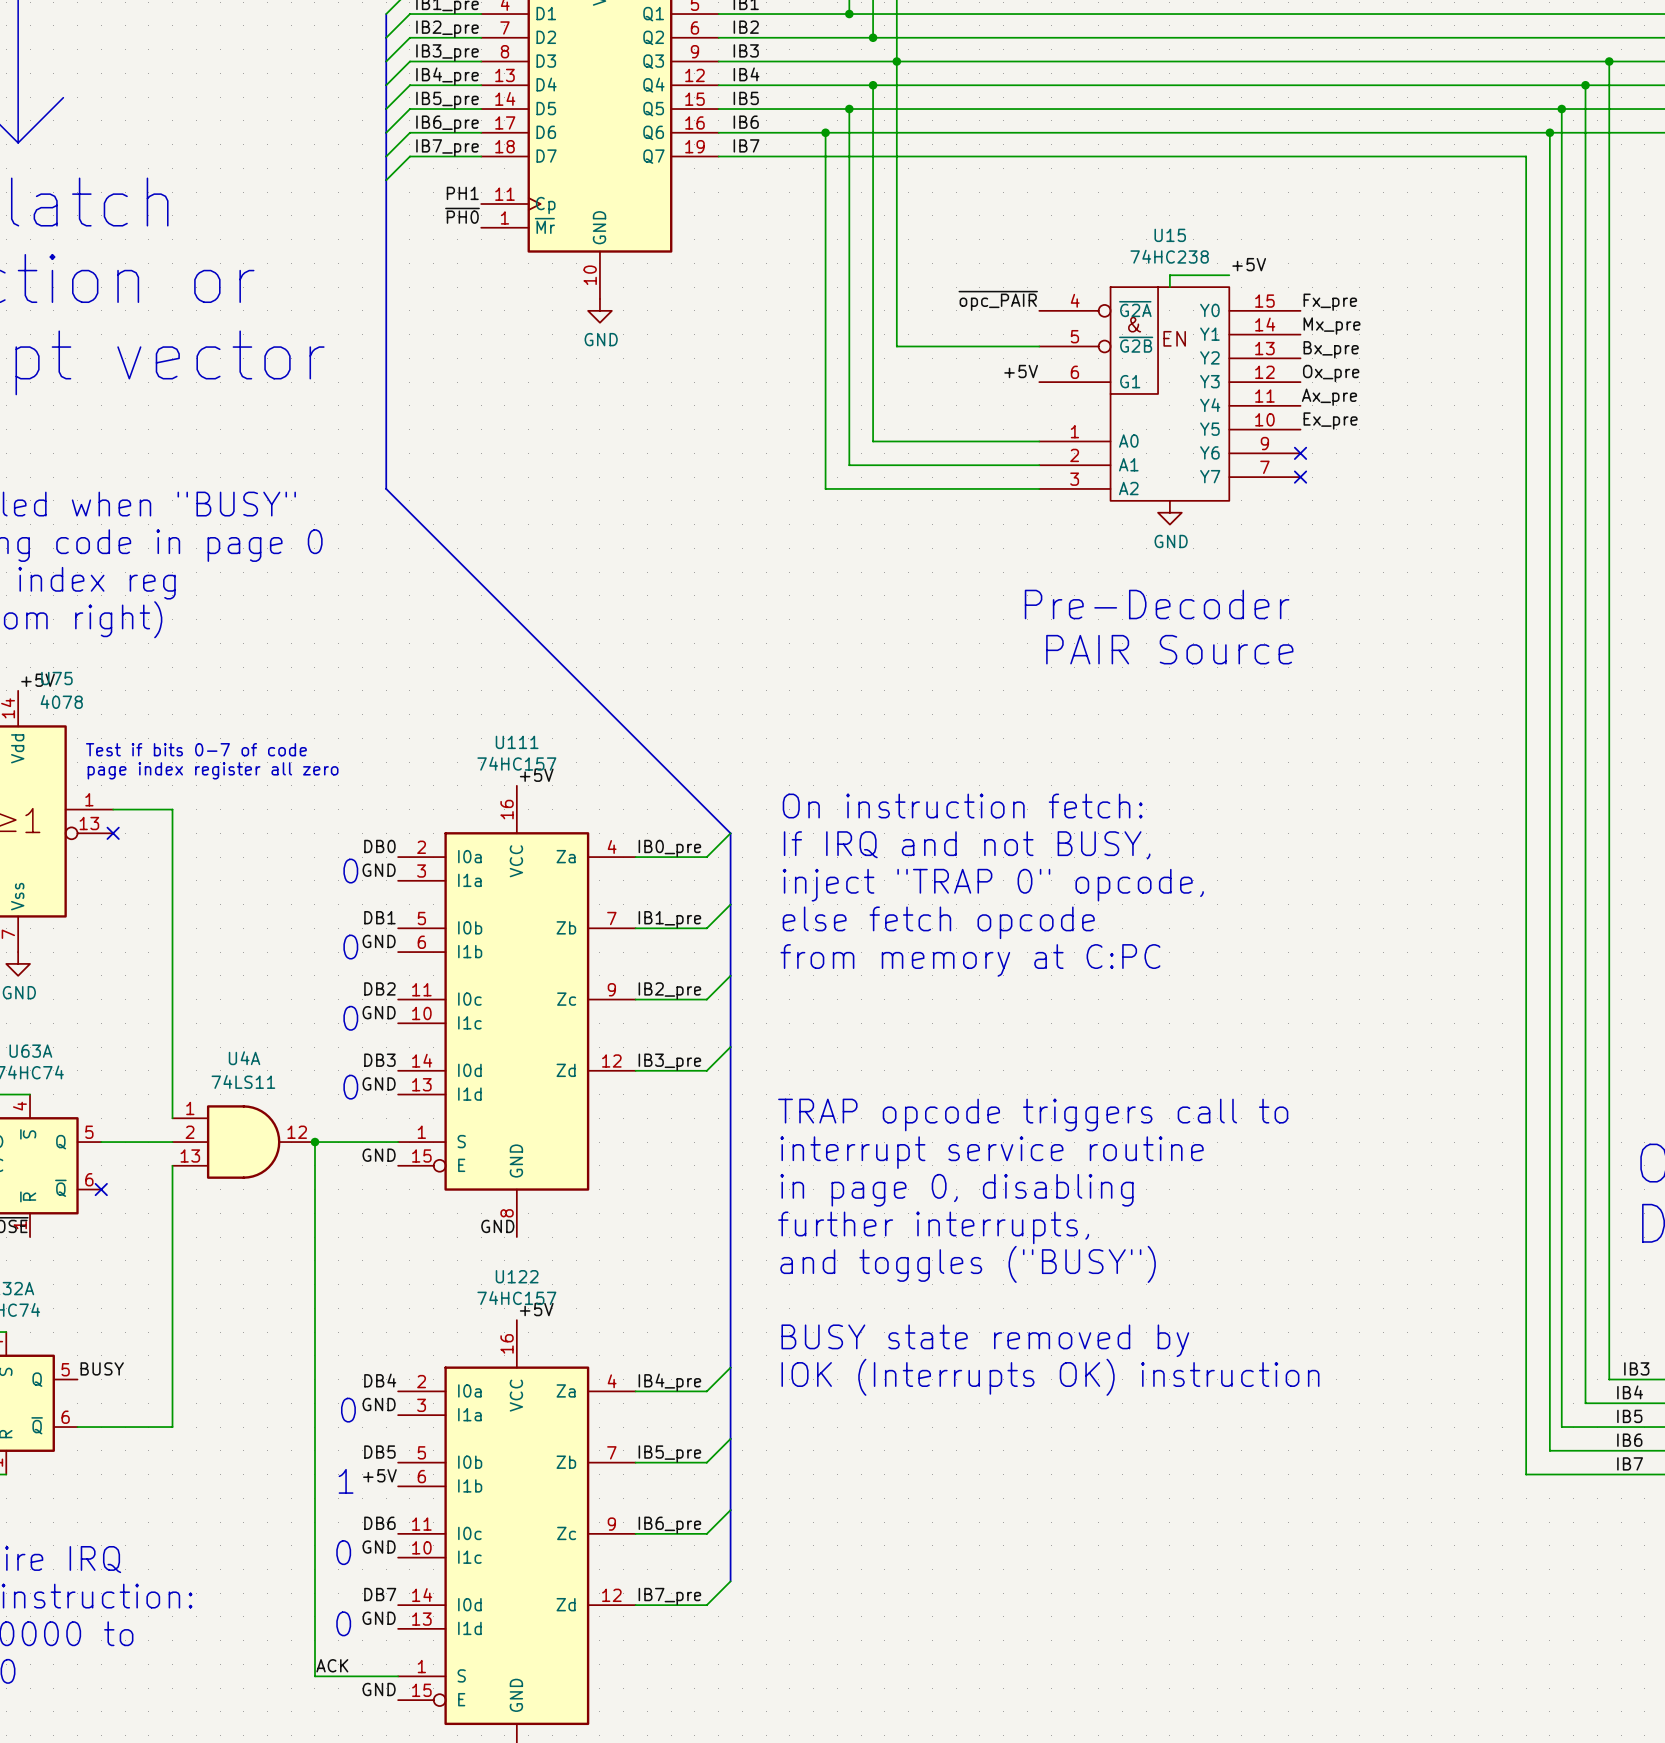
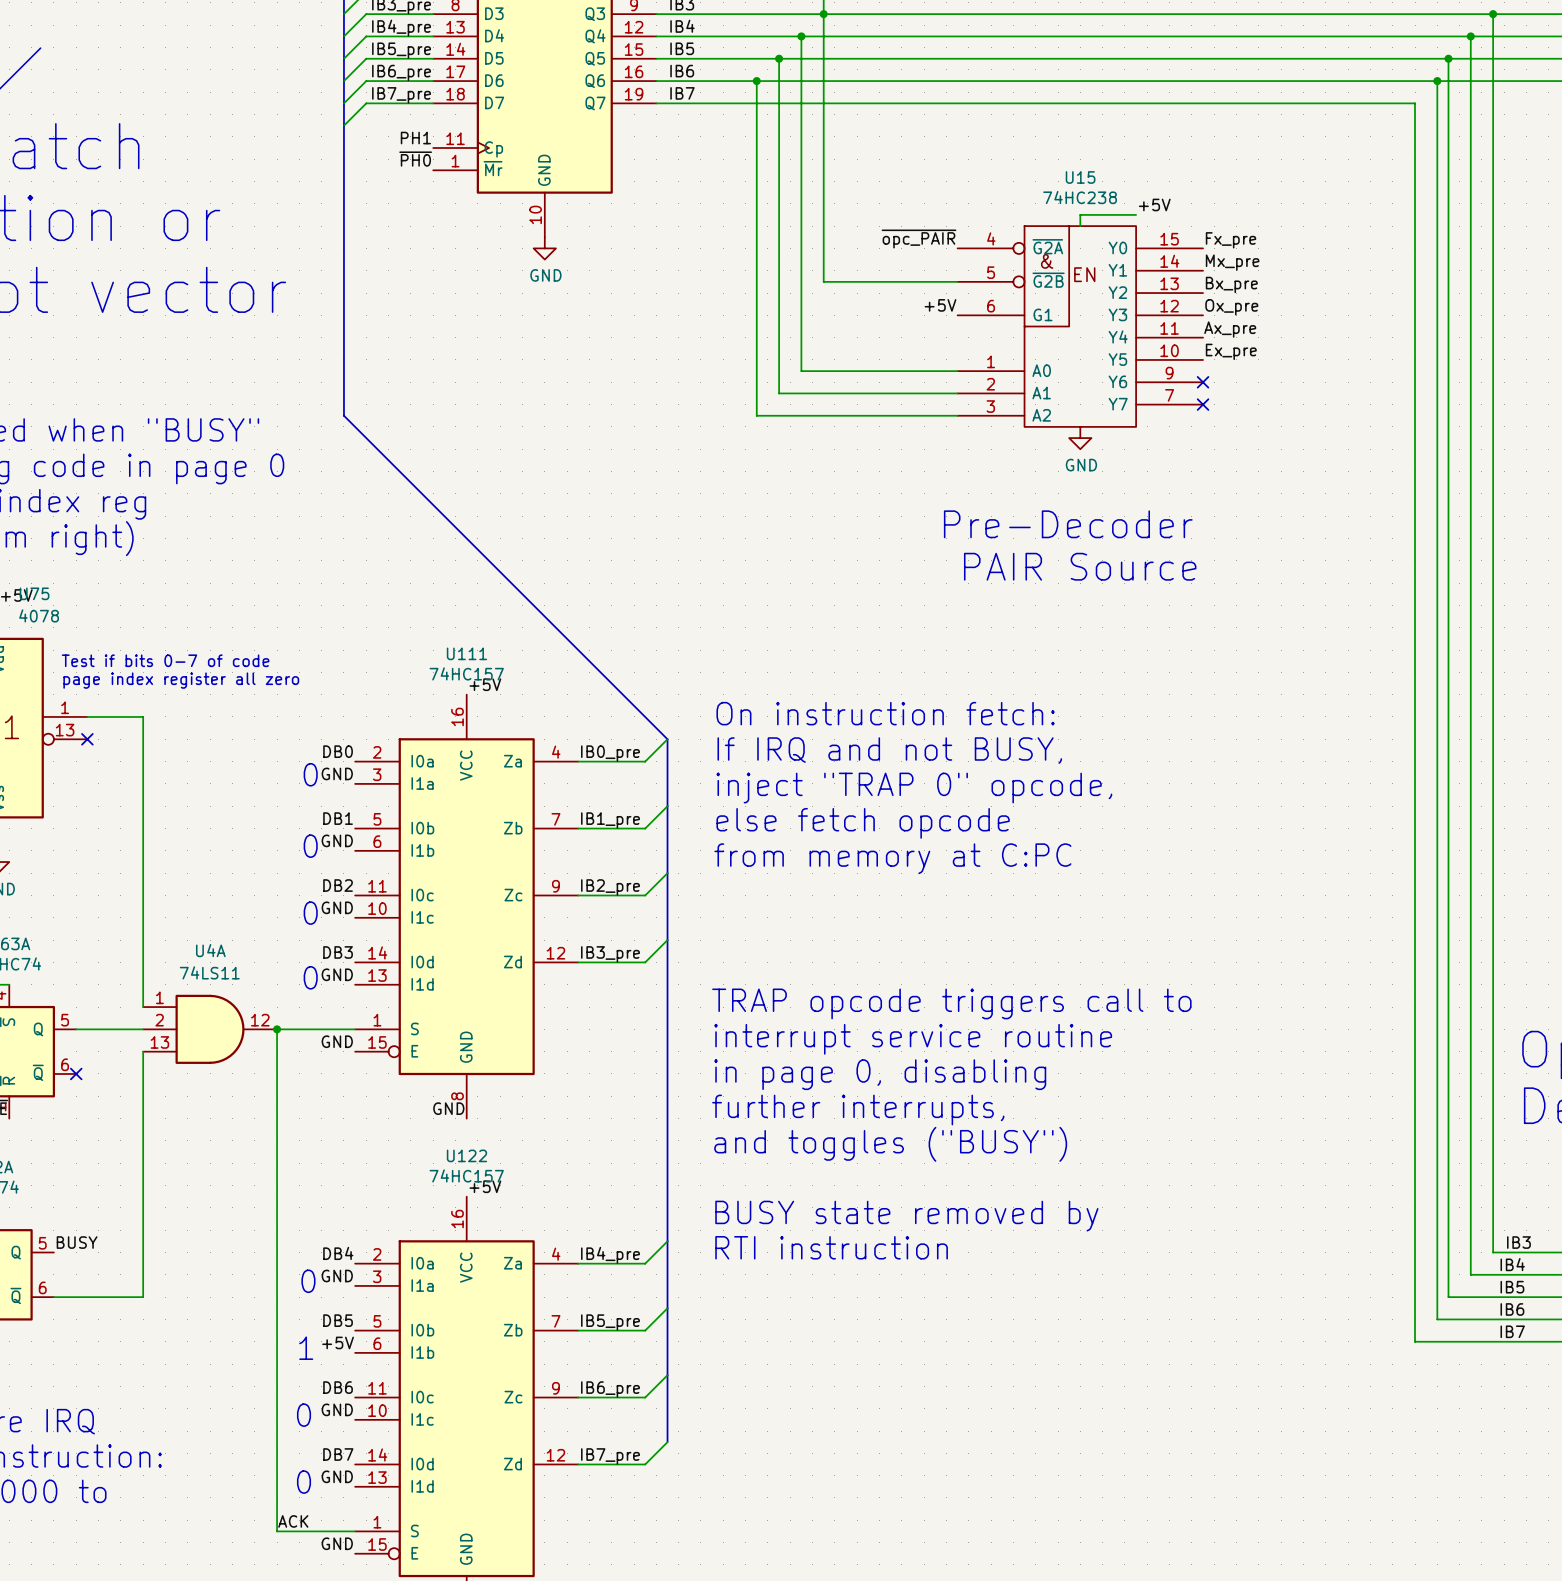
text: IOK (Interrupts OK) instruction (1050, 1377) -> RTI instruction (831, 1247)

